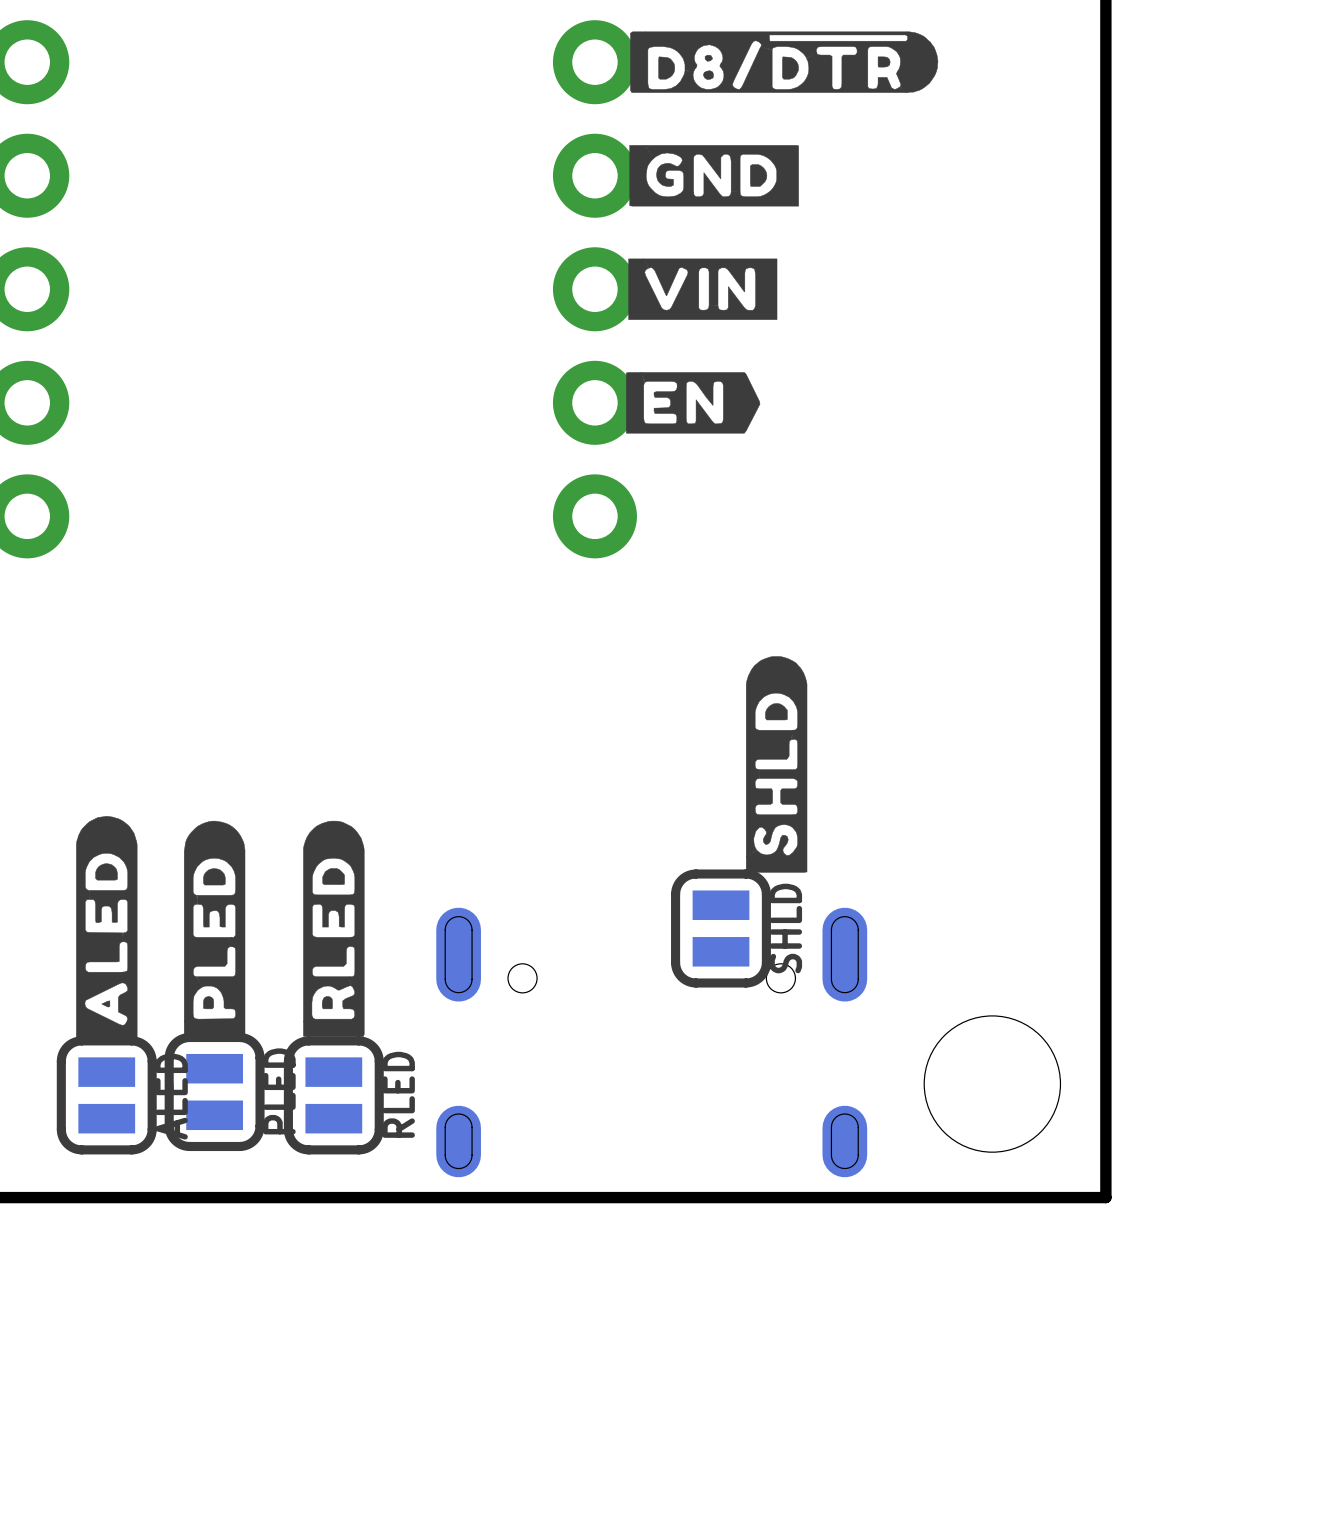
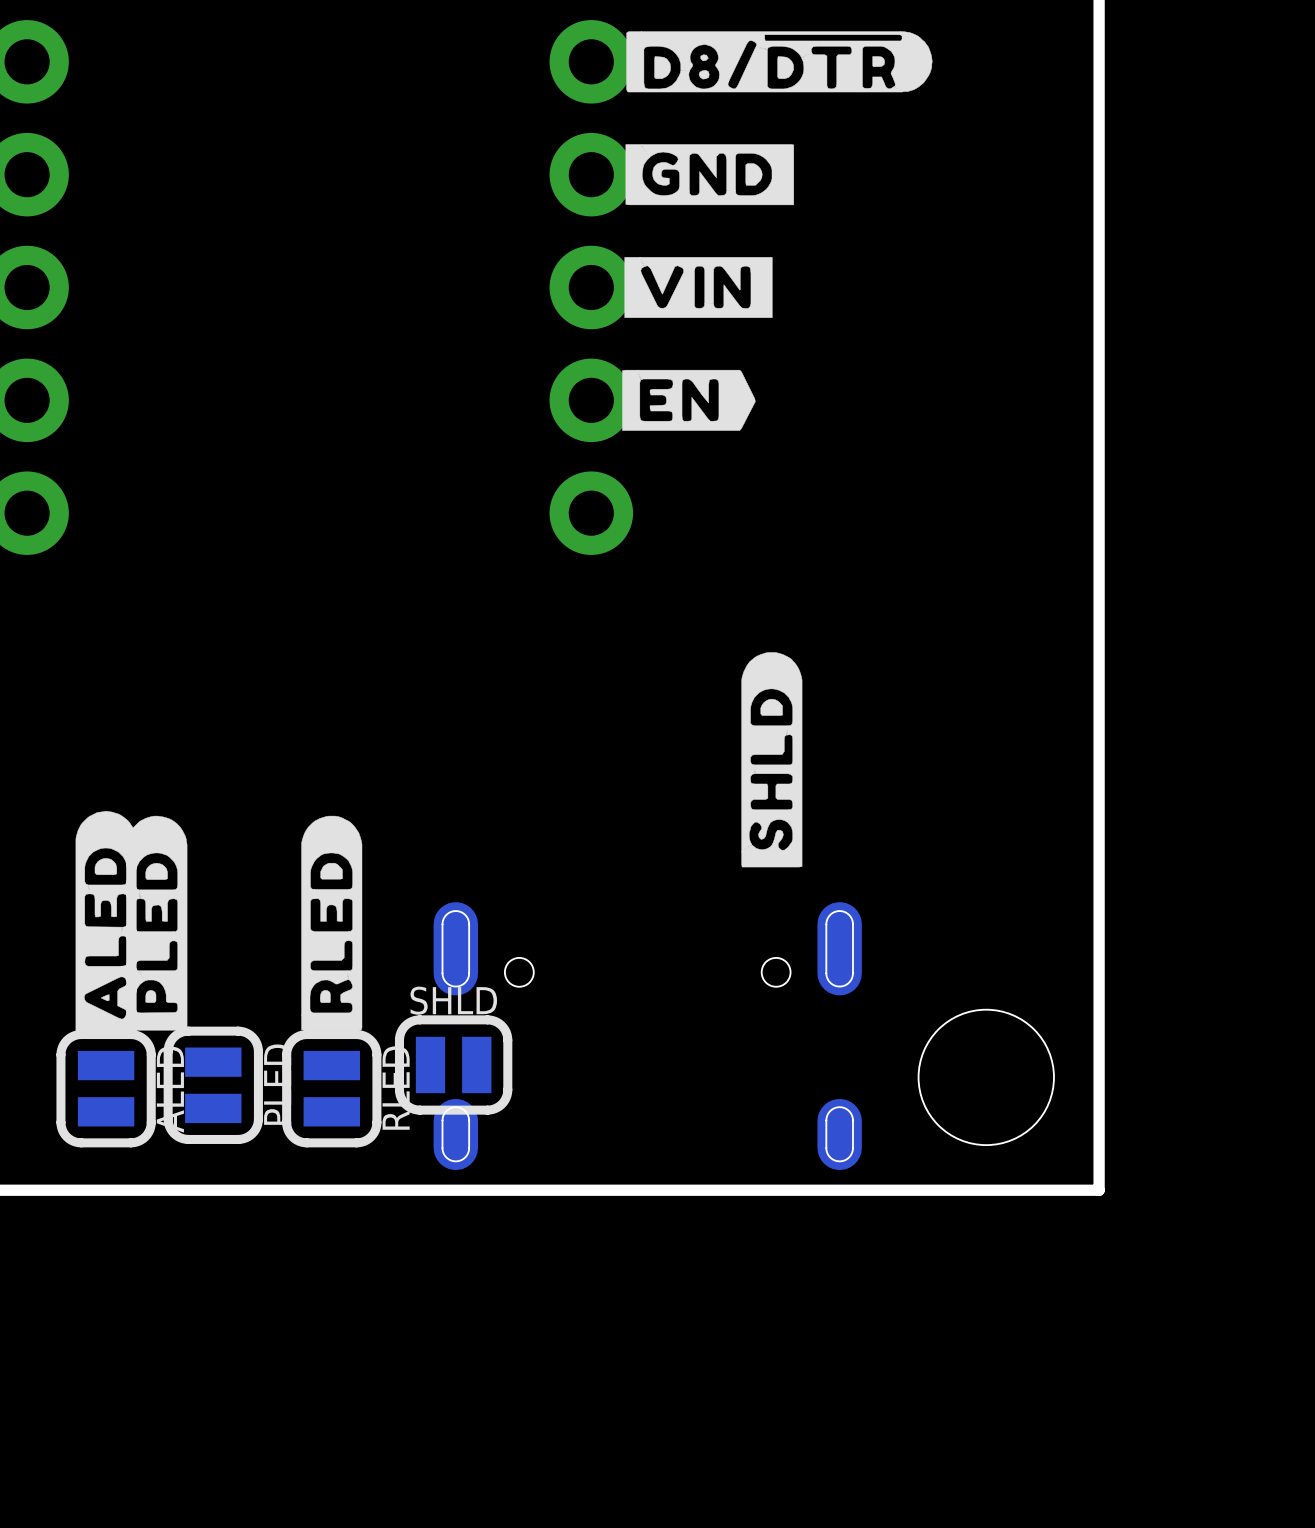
drawing position: (214, 928) -> (156, 923)
SHLD rotation: 0° (720, 928) -> 90° clockwise (453, 1064)
SHLD position: (720, 928) -> (453, 1064)
SHLD name position: SHLD (785, 928) -> SHLD (453, 1000)

